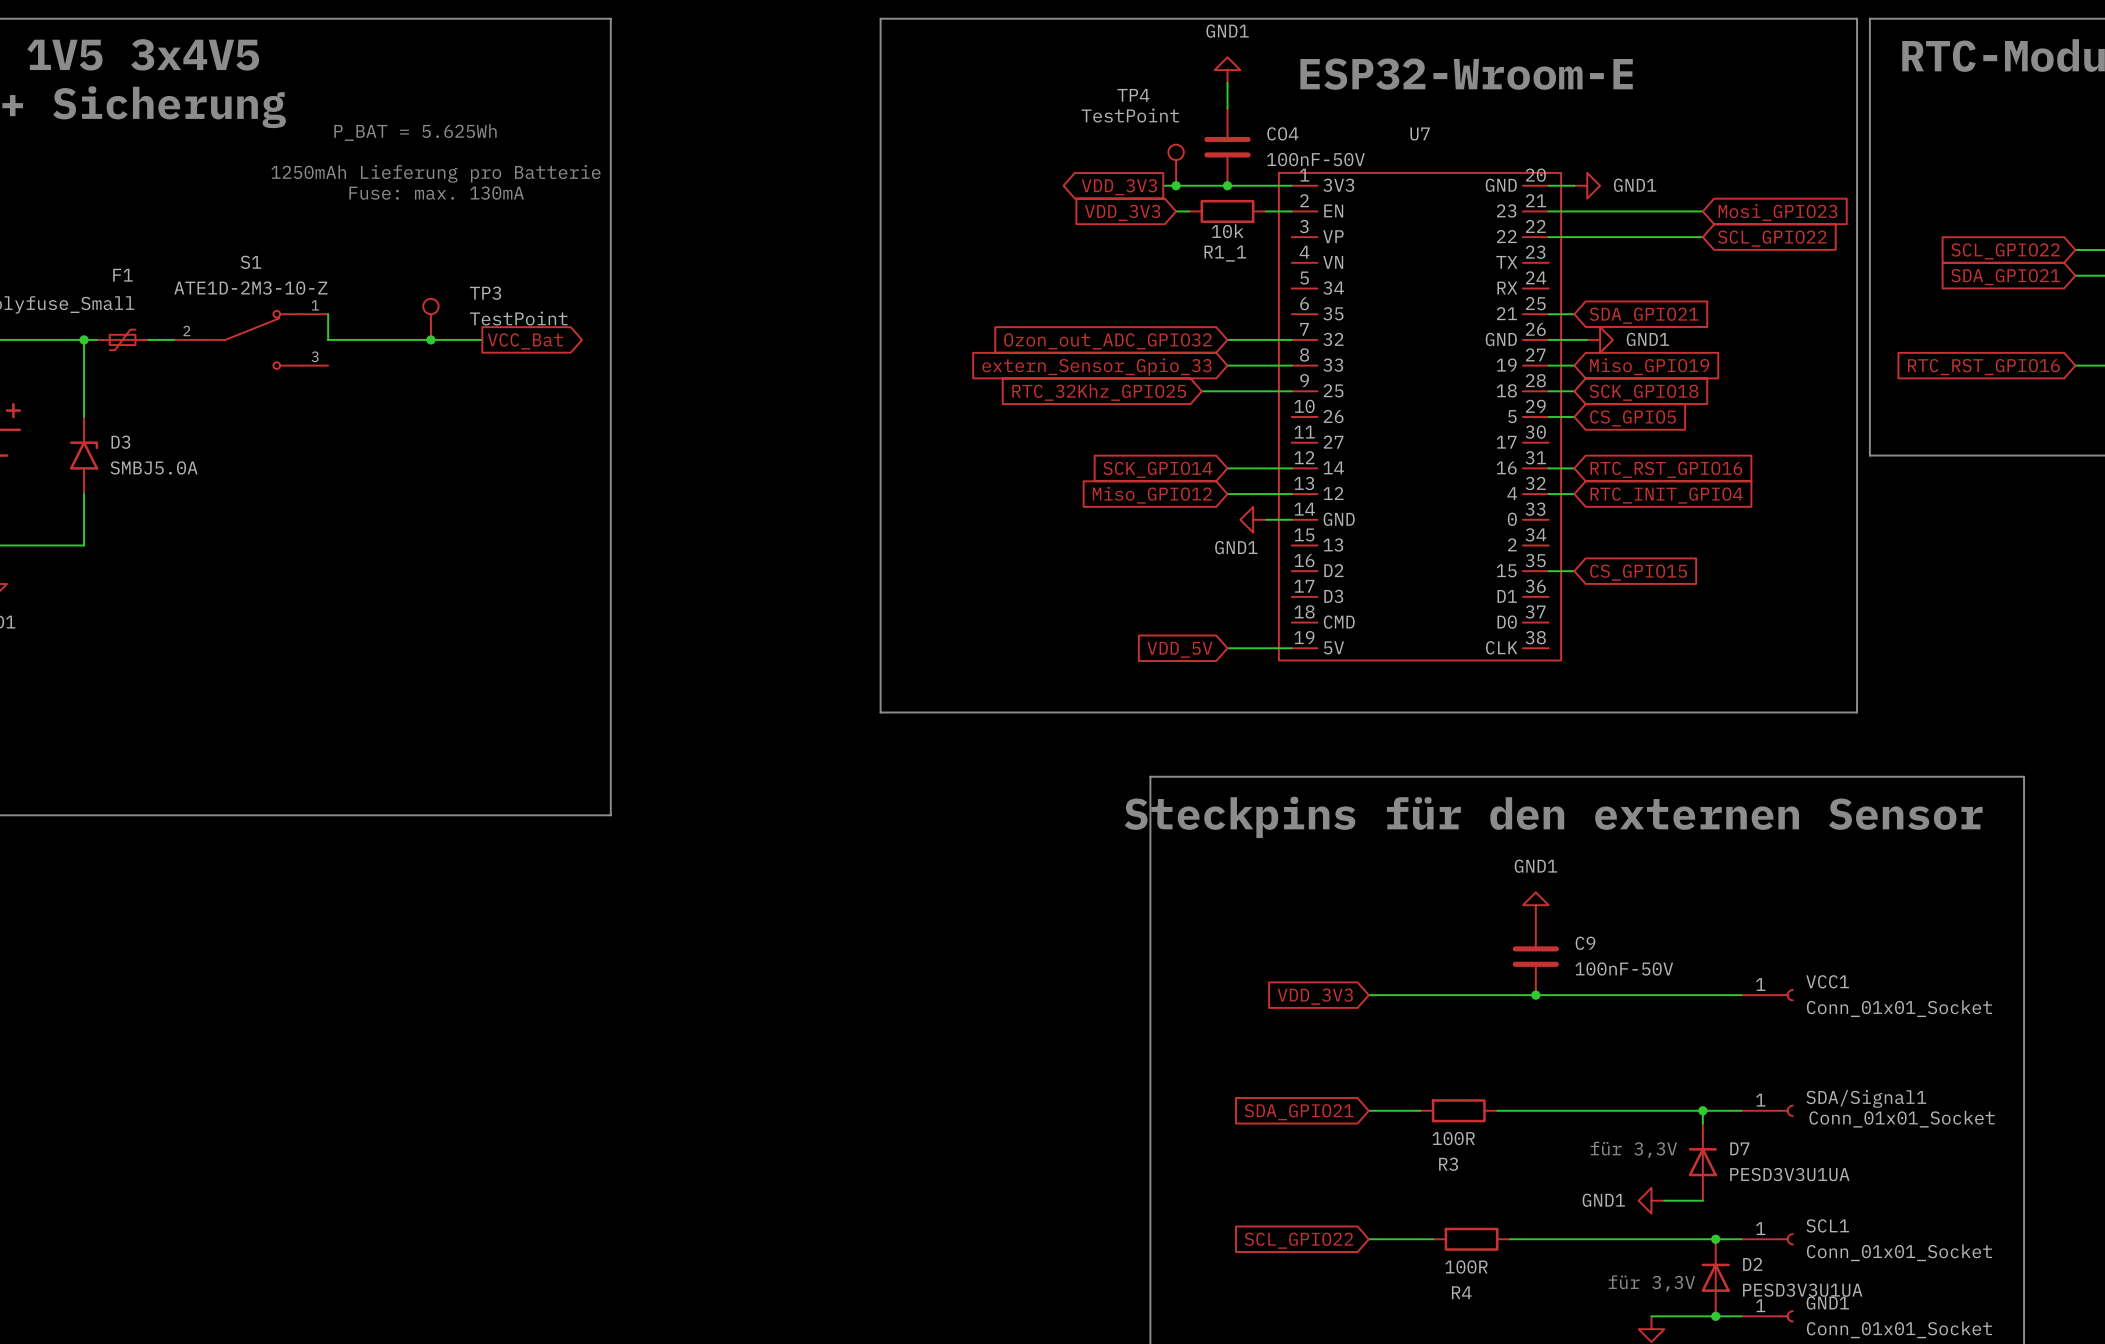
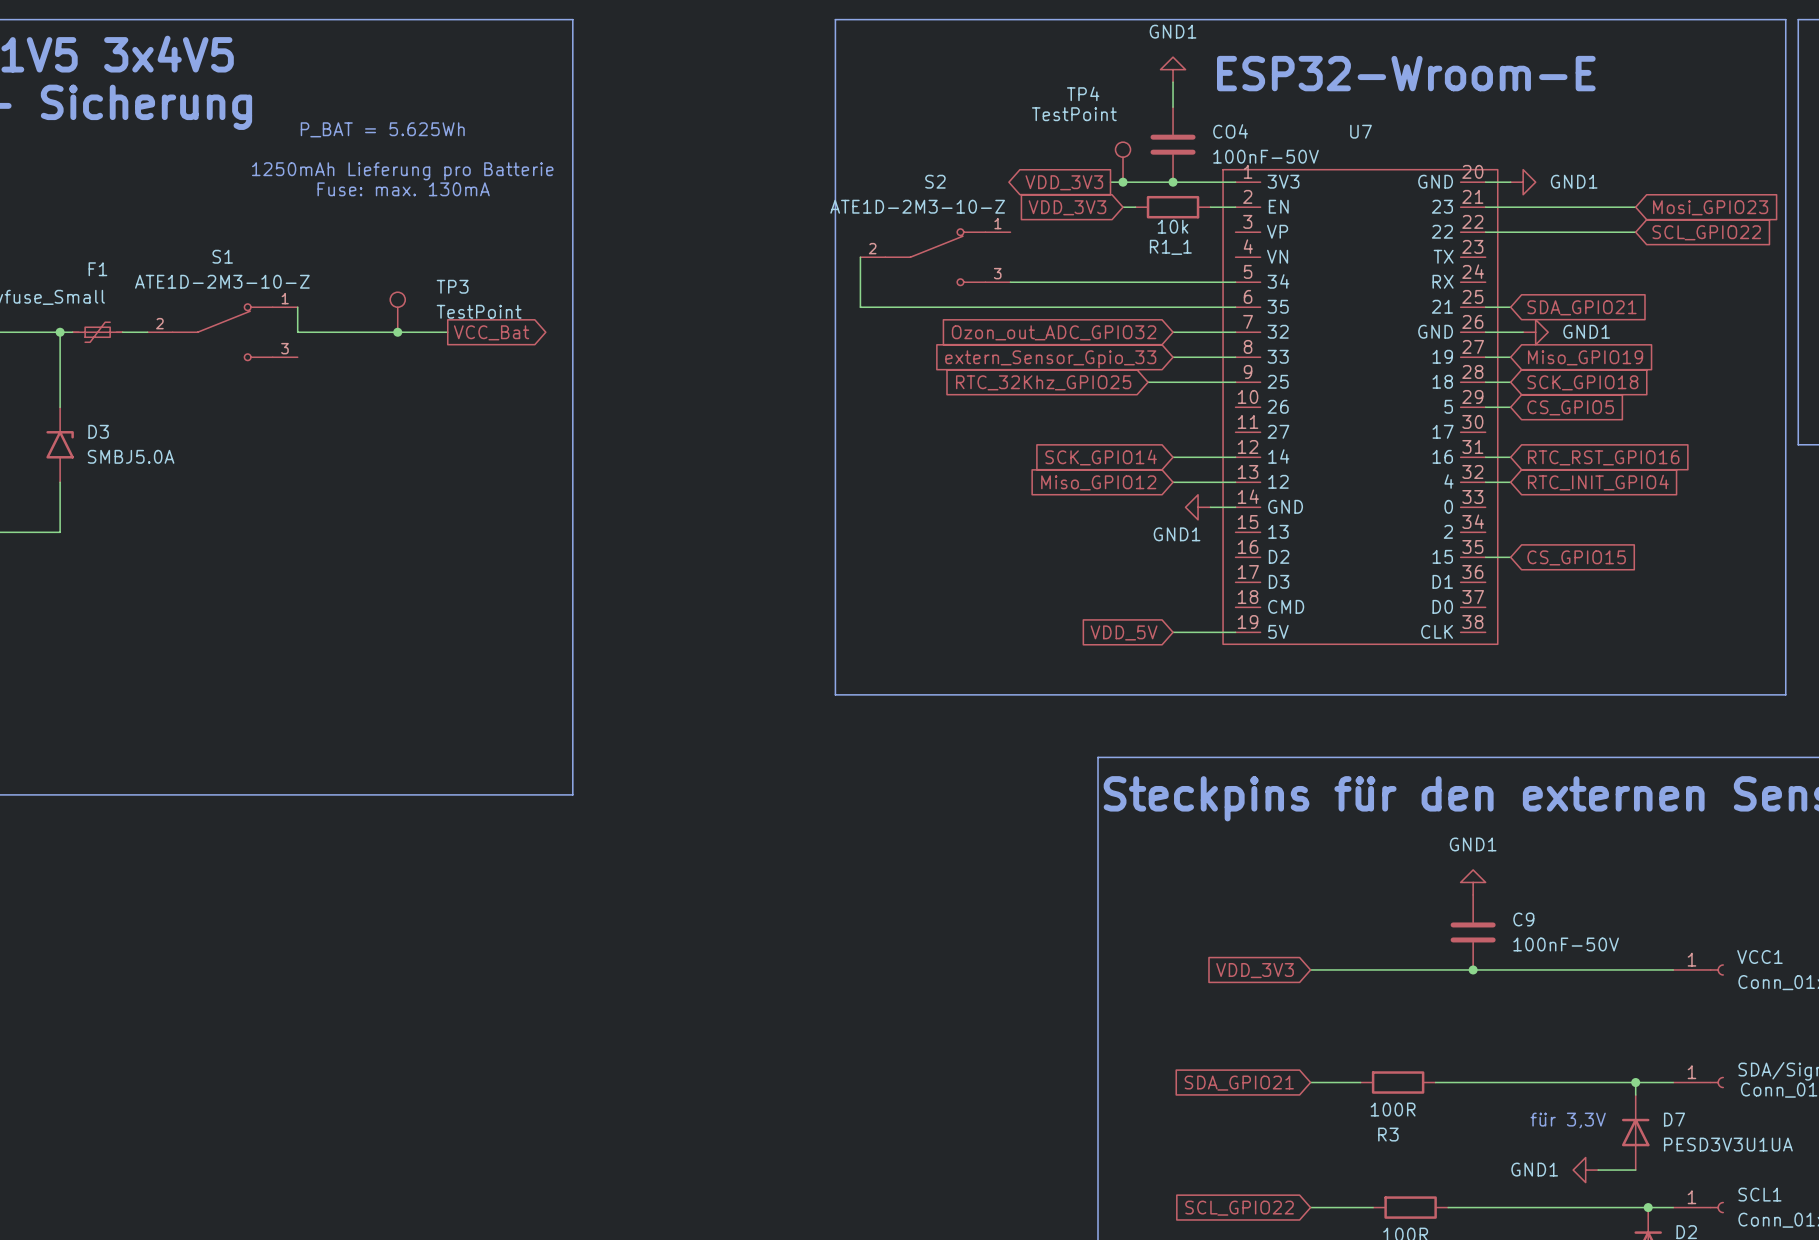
wire: none -> (860, 257) (860, 307) (1235, 307)
S2: none -> ATE1D-2M3-10-Z (935, 257)
wire: none -> (1010, 282) (1235, 282)

